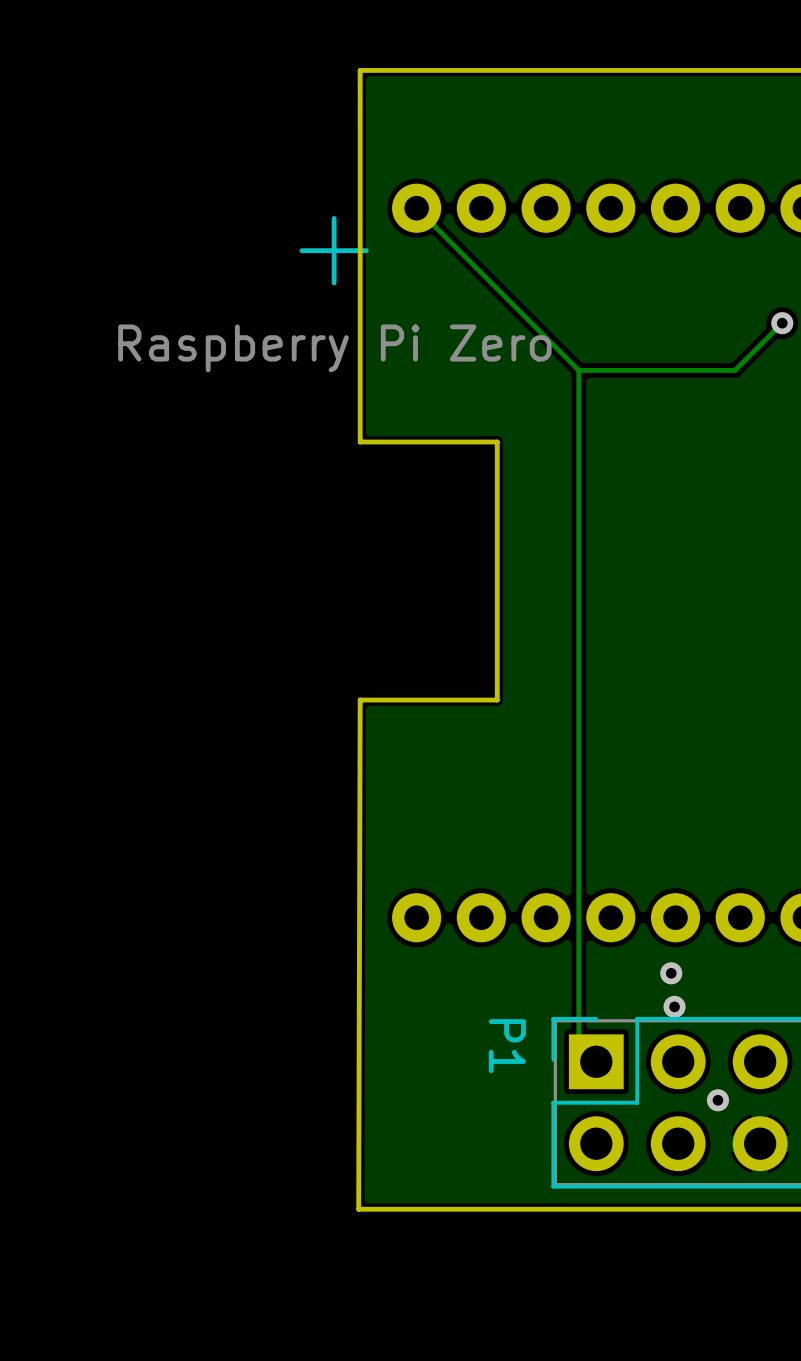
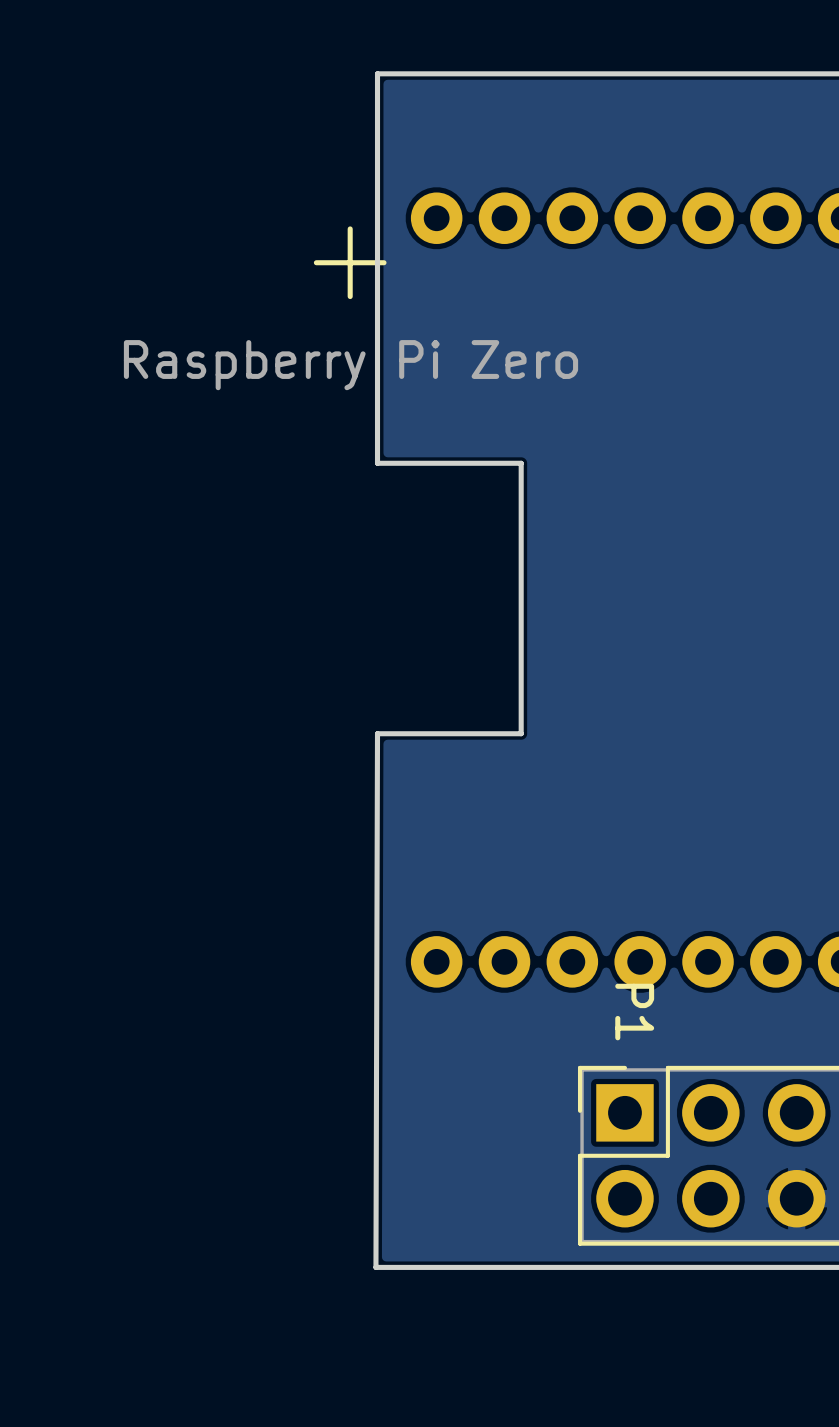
track: (416, 208) (578, 370) -> none
track: (782, 323) (735, 370) (578, 370) -> none
via: (782, 323) -> none
track: (578, 370) (578, 1044) (596, 1061) -> none
via: (671, 973) -> none
via: (674, 1006) -> none
P1 name position: P1 (507, 1046) -> P1 (634, 1012)
via: (717, 1100) -> none

